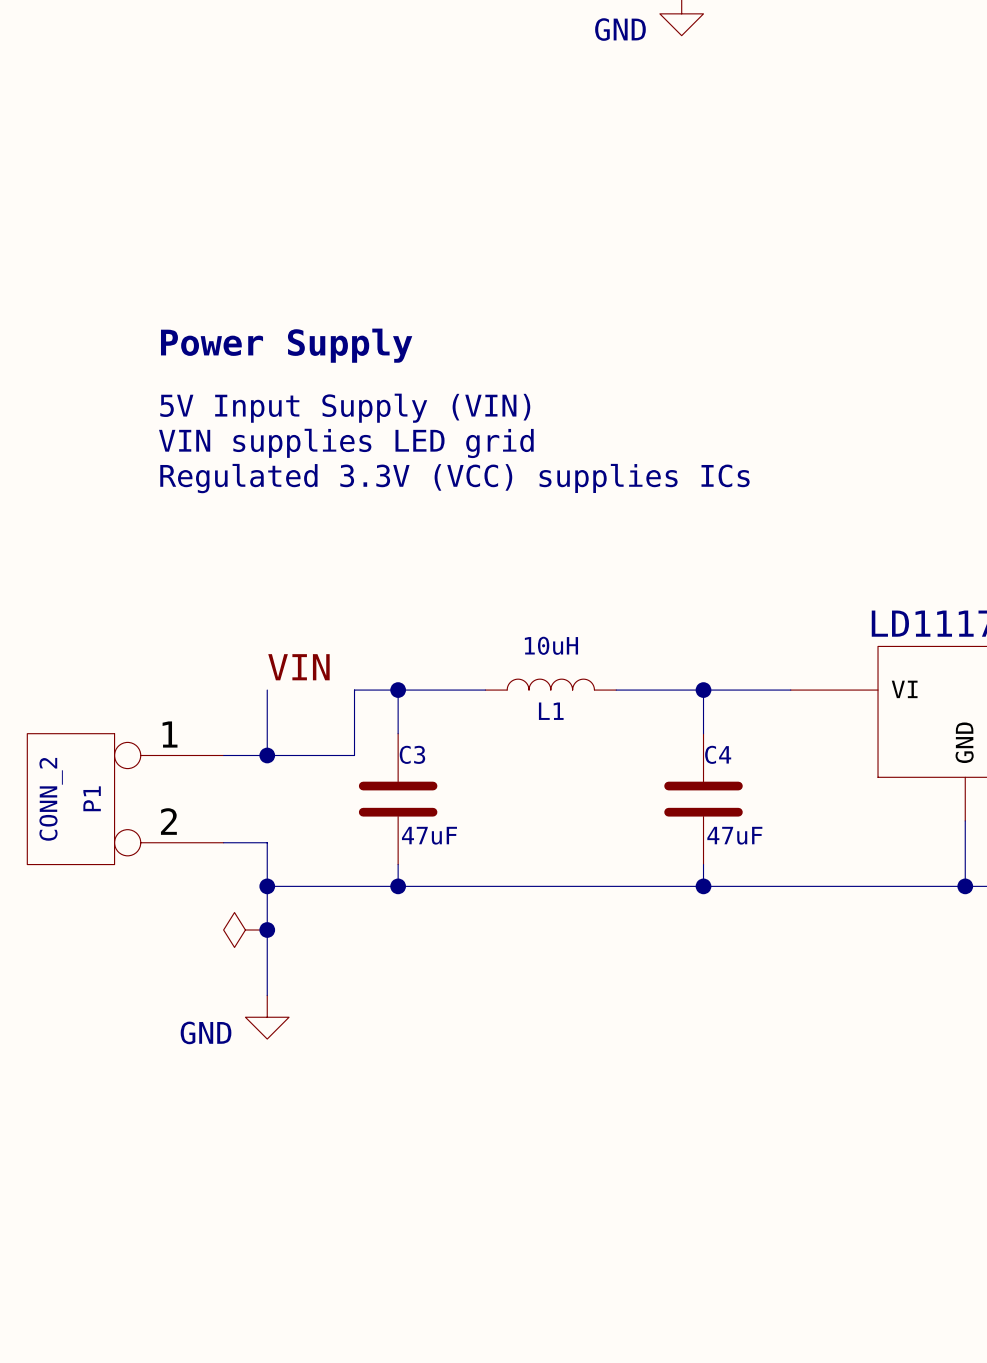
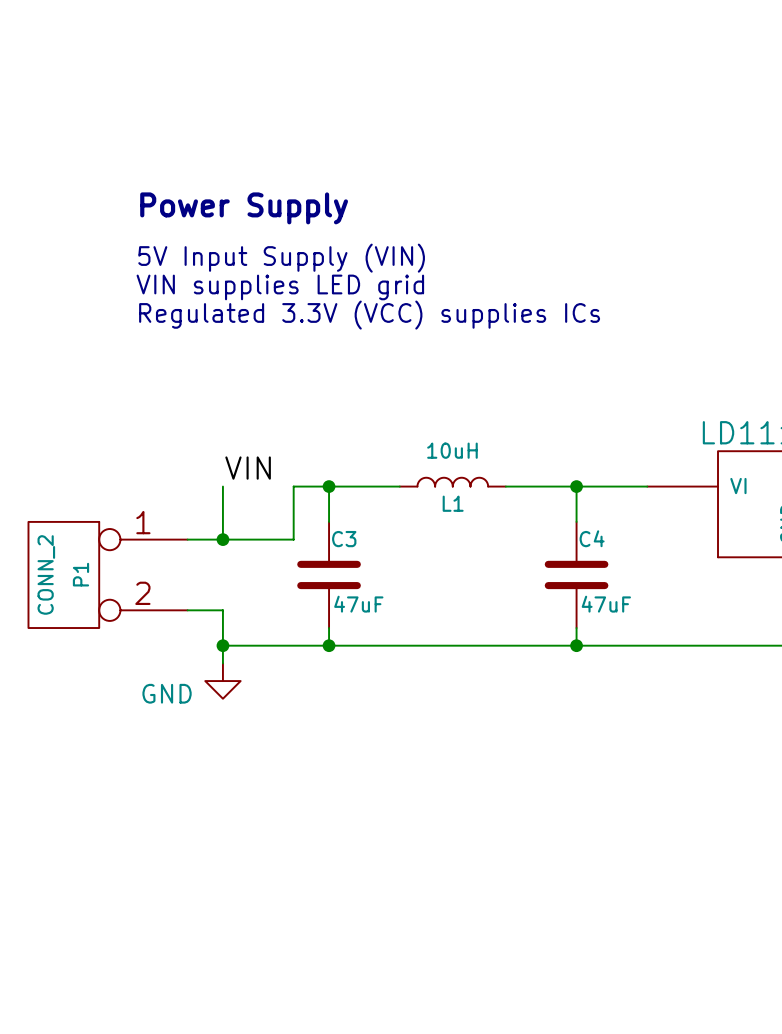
wire: (267, 908) (267, 995) -> none
power symbol: (245, 930) -> none
junction: (267, 930) -> none
power symbol position: GND (267, 1017) -> GND (222, 681)

